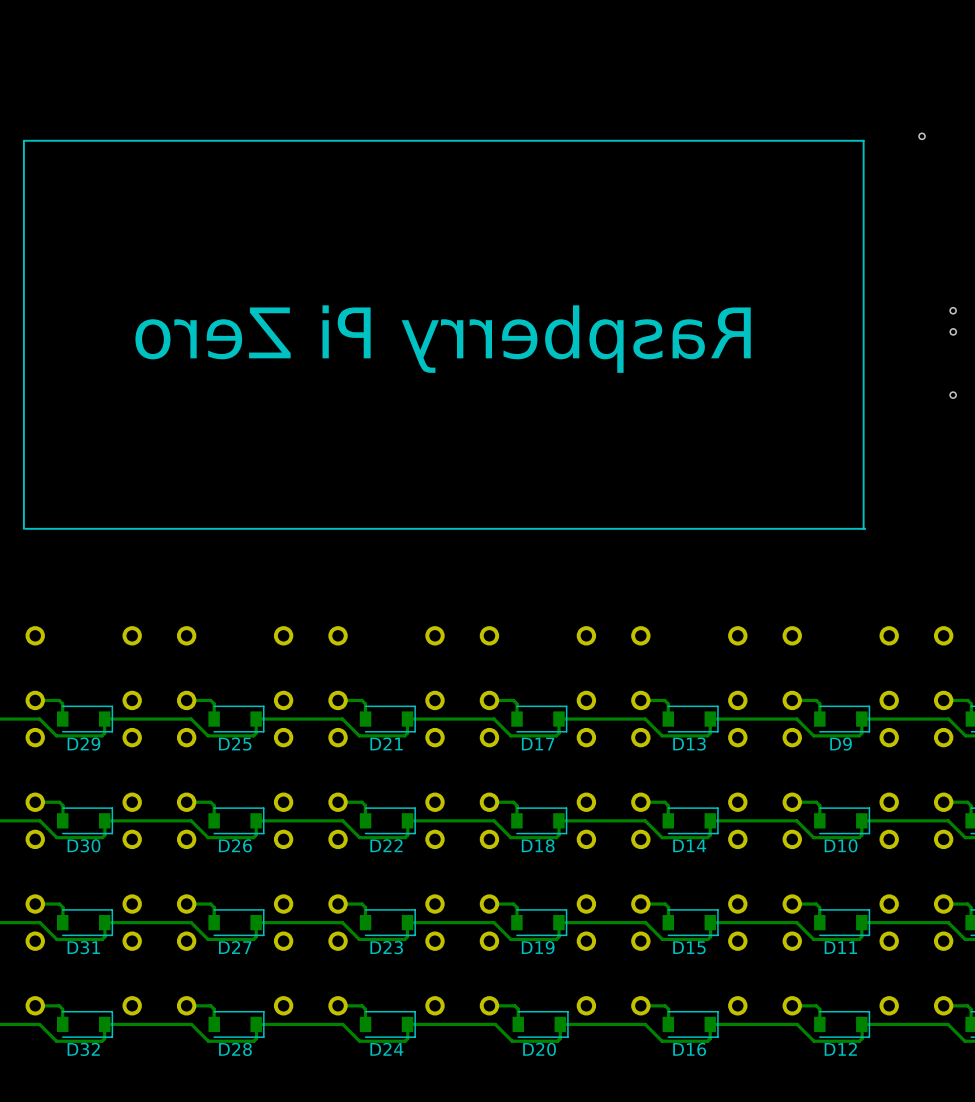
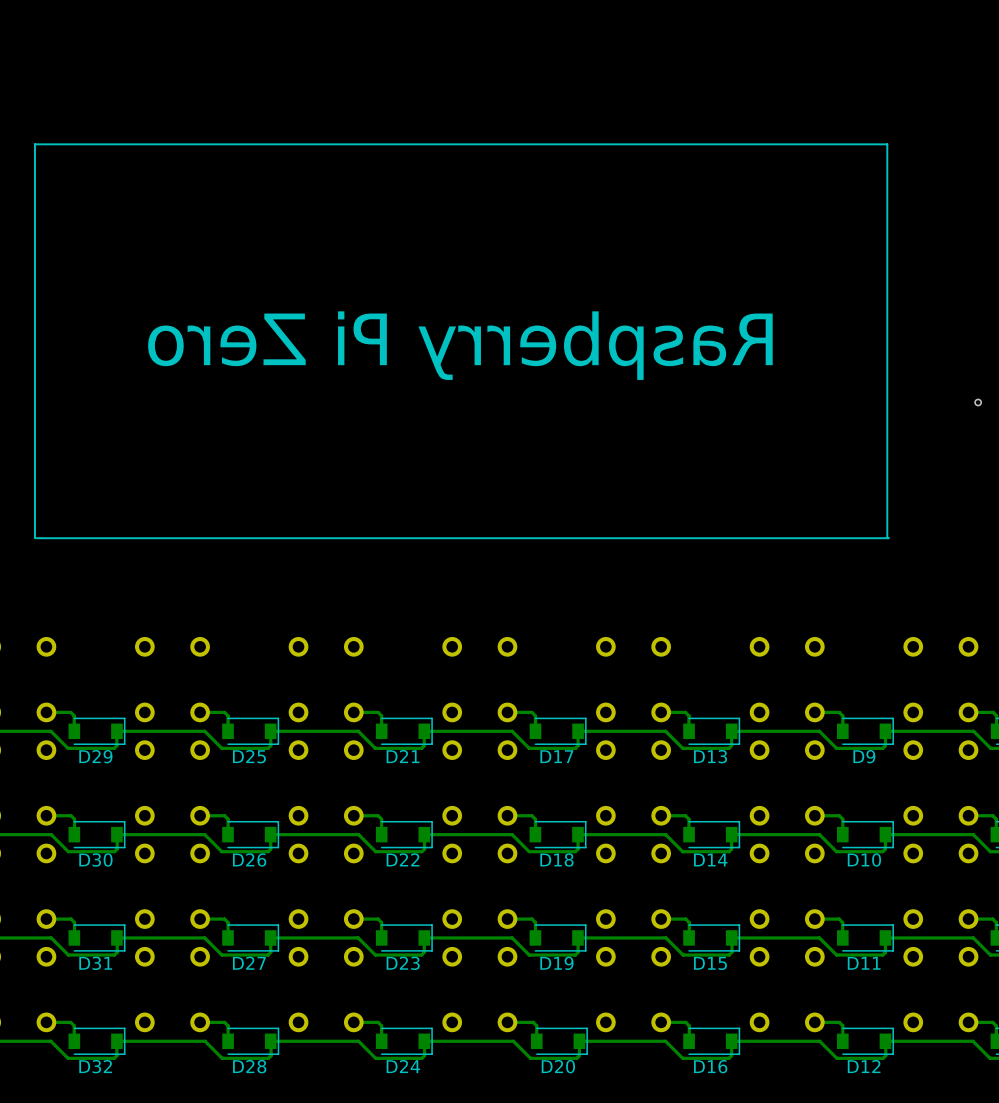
via: (922, 136) -> none
via: (953, 310) -> none
via: (953, 331) -> none

